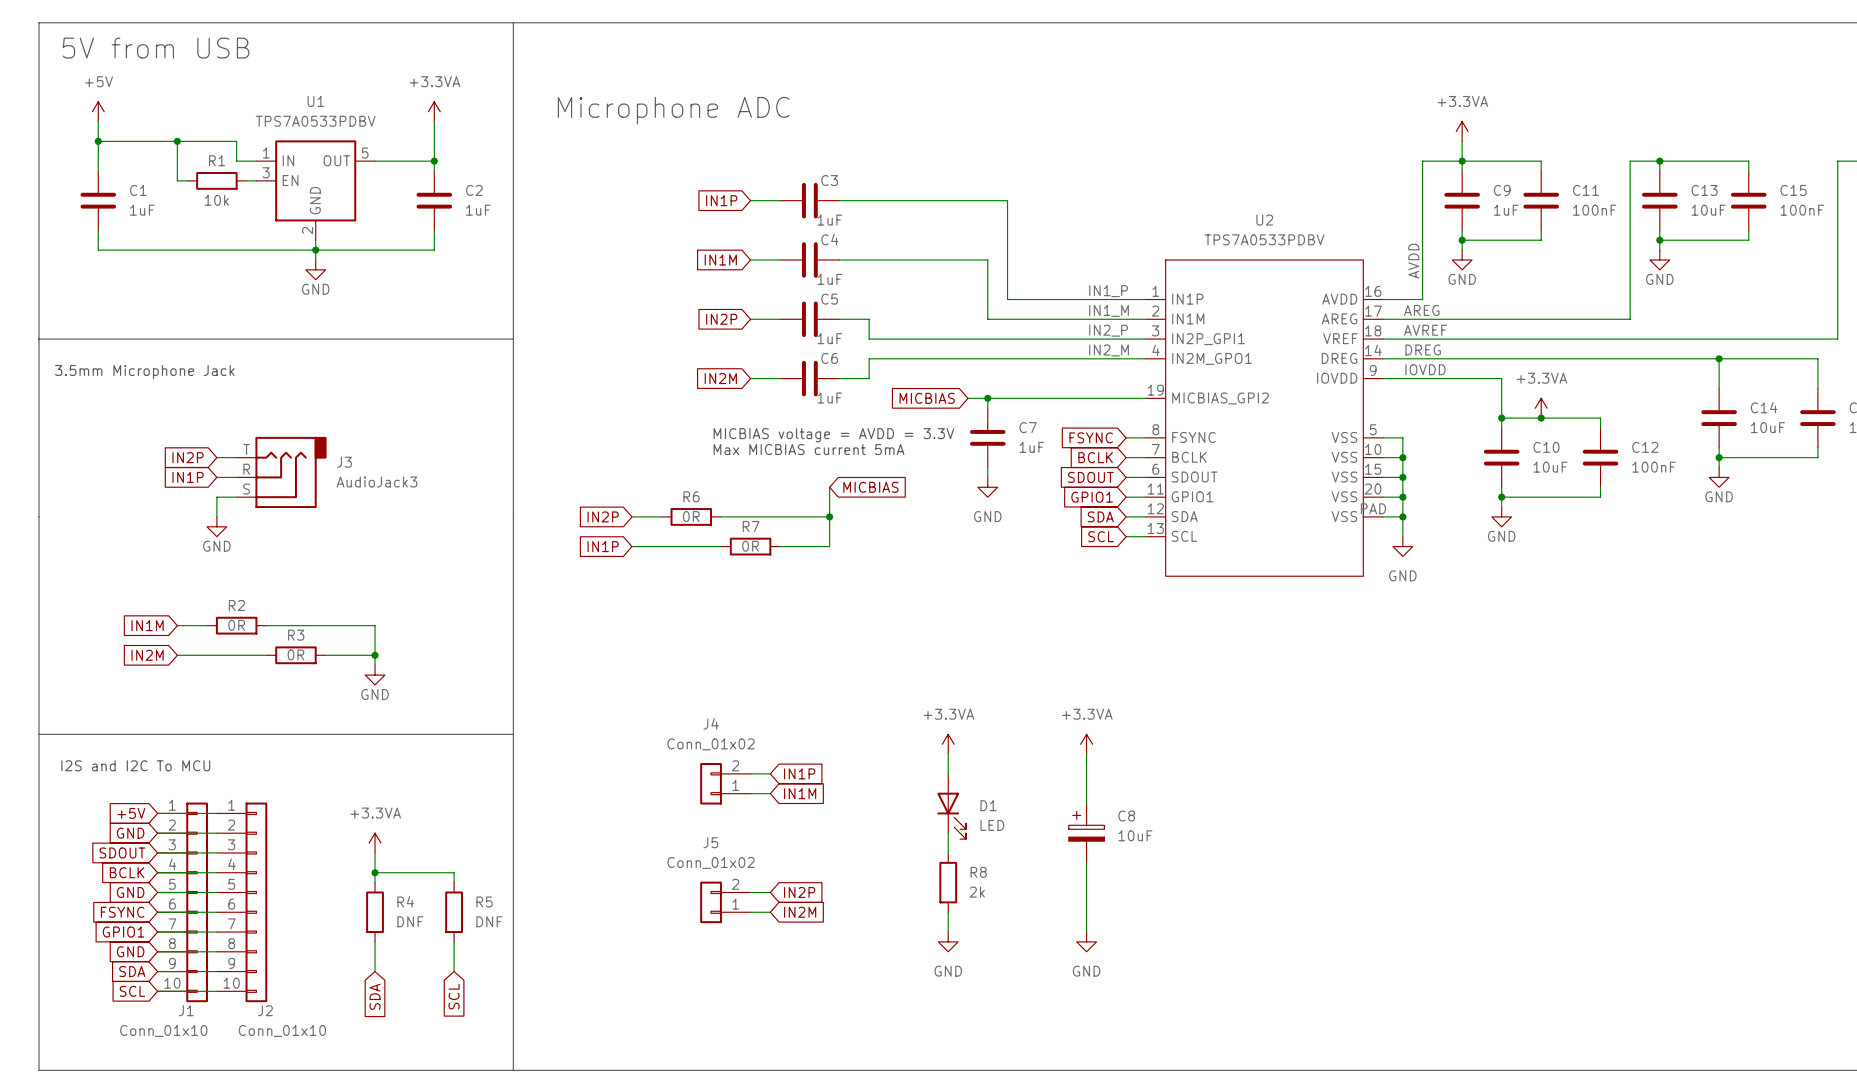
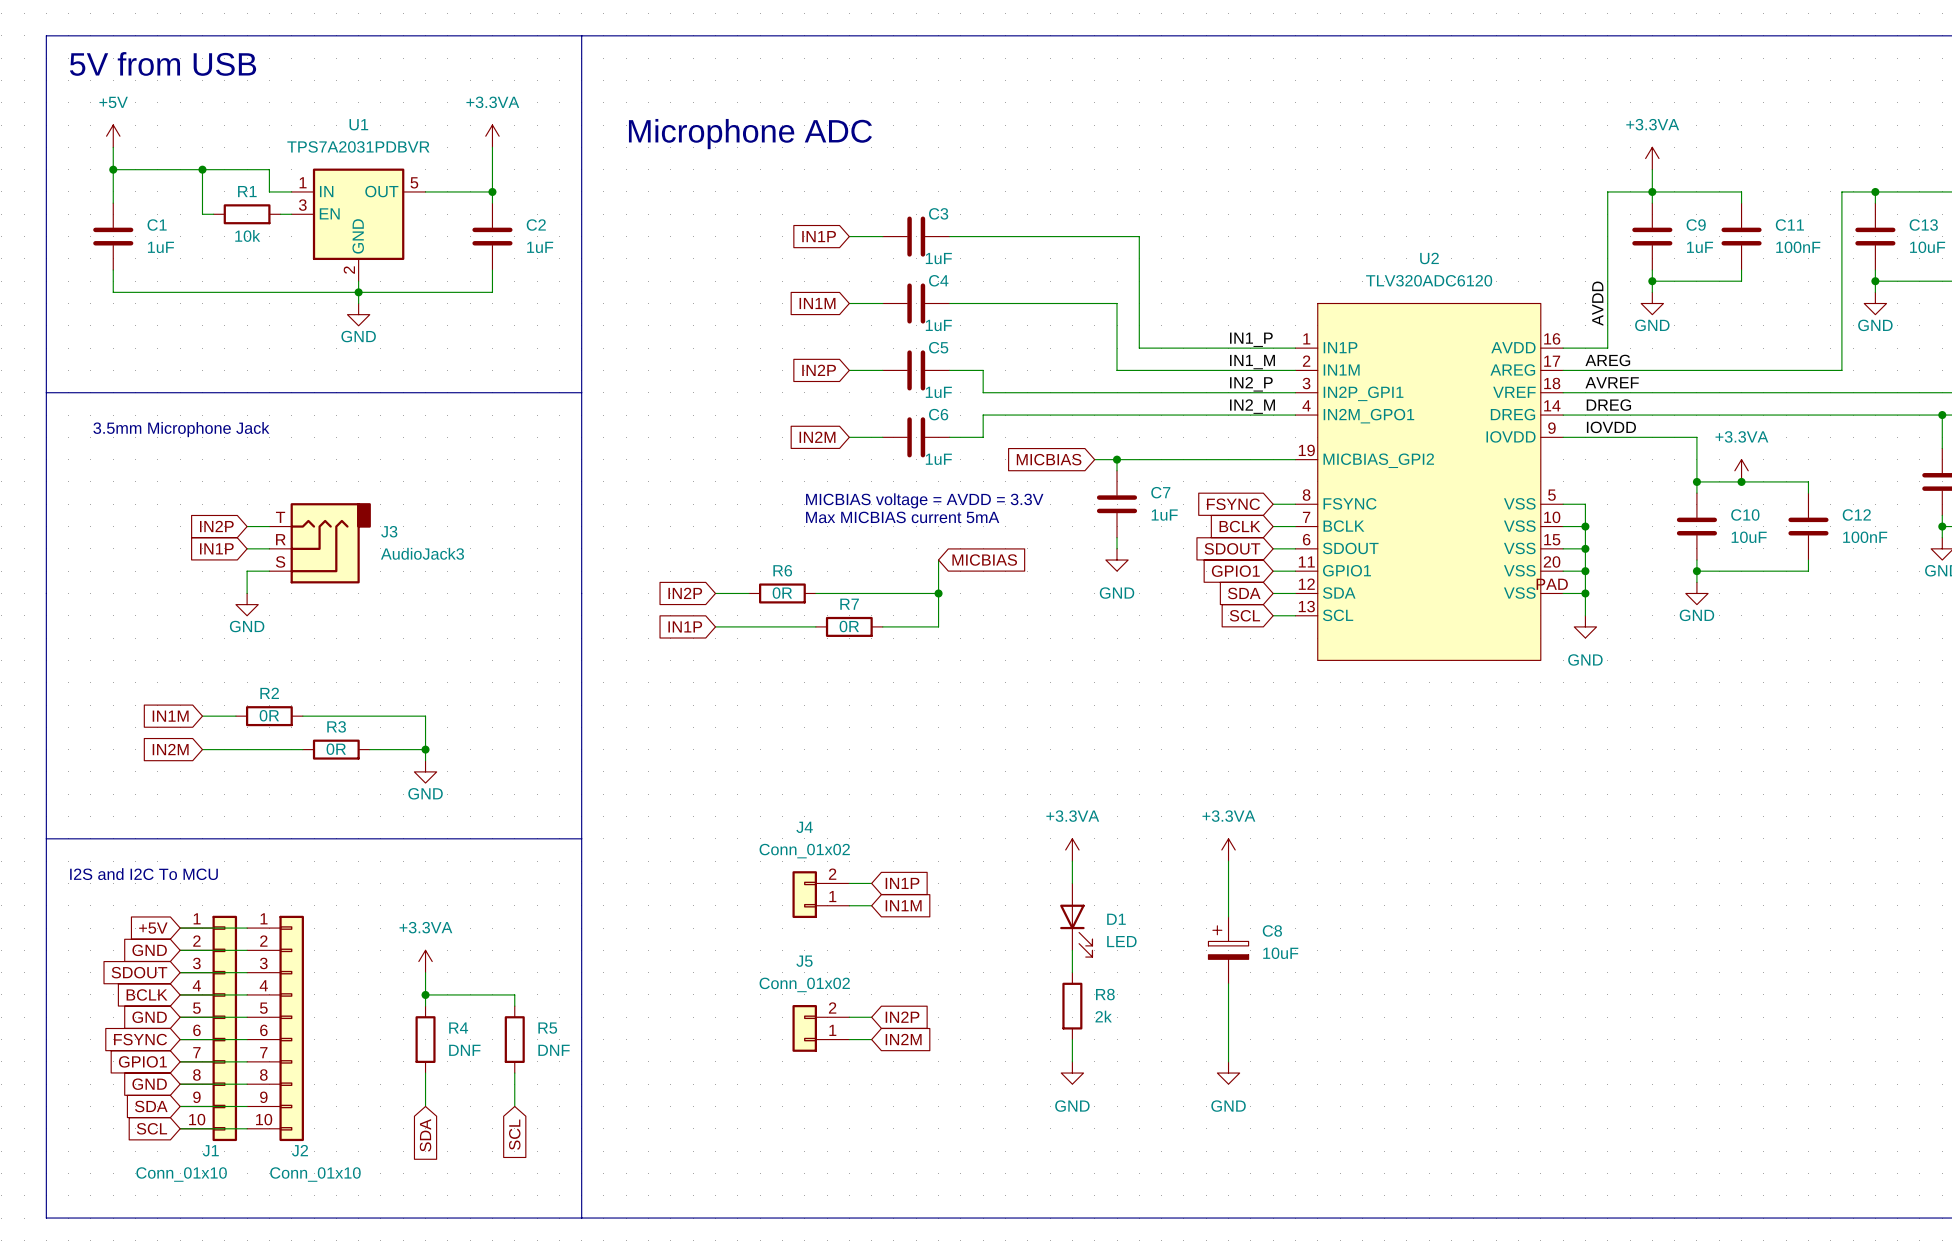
U1 value: TPS7A0533PDBV (315, 121) -> TPS7A2031PDBVR (358, 146)
U2 value: TPS7A0533PDBV (1264, 239) -> TLV320ADC6120 (1429, 280)

